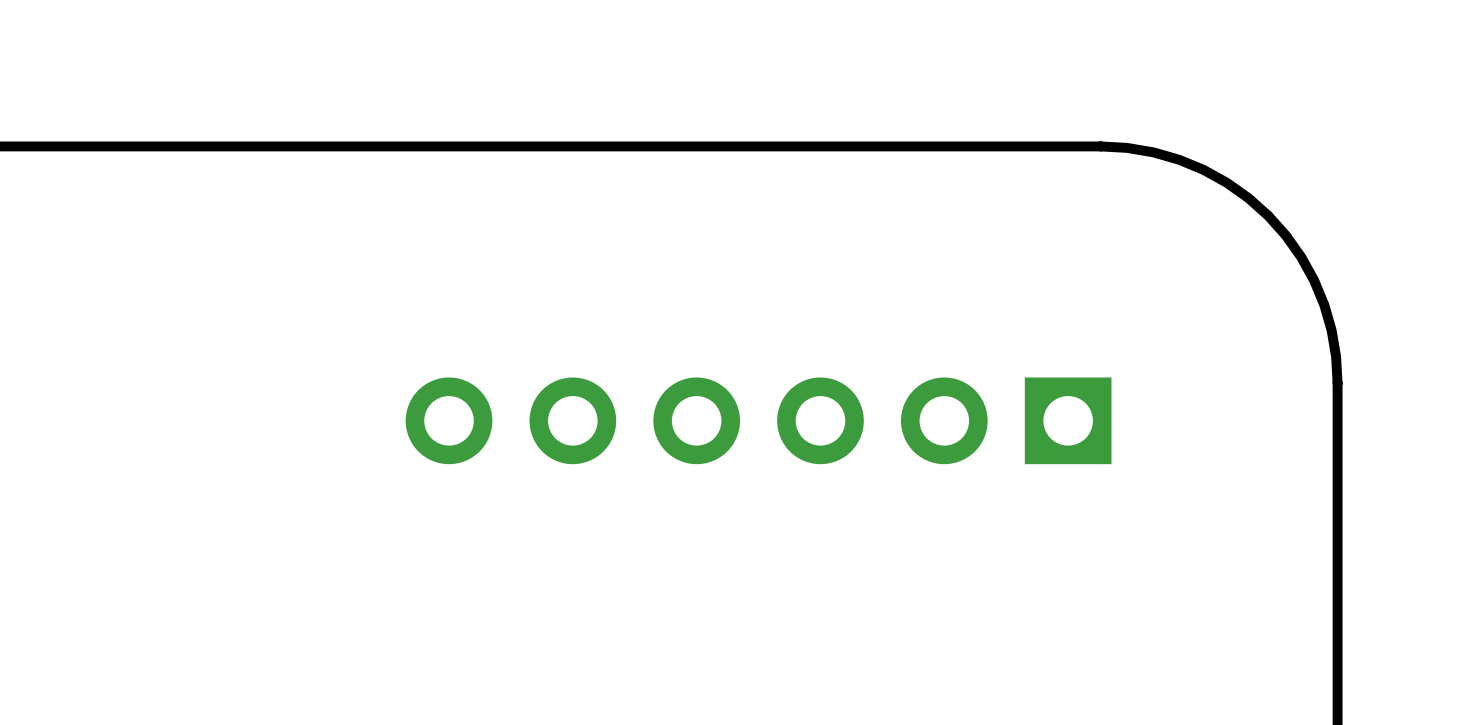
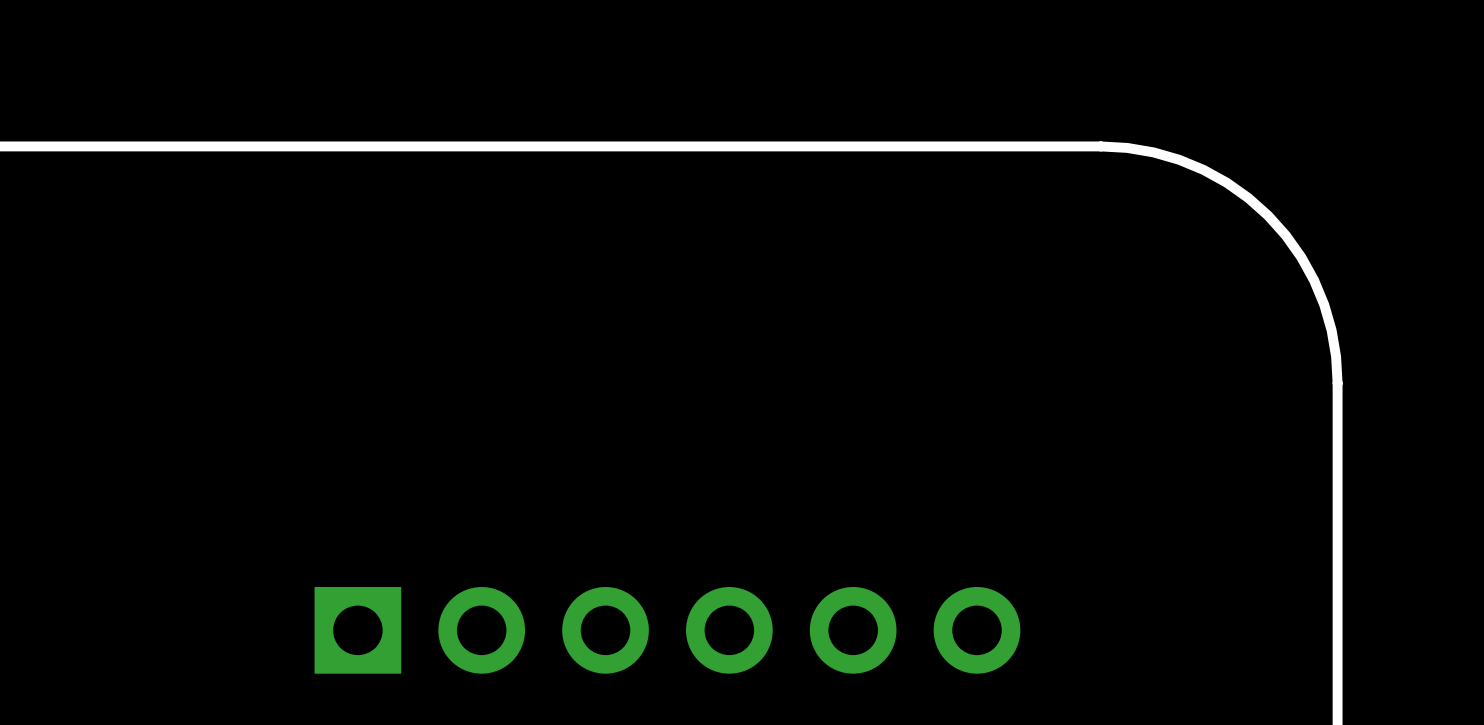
part rotation: 0° (758, 420) -> 180° (667, 630)

